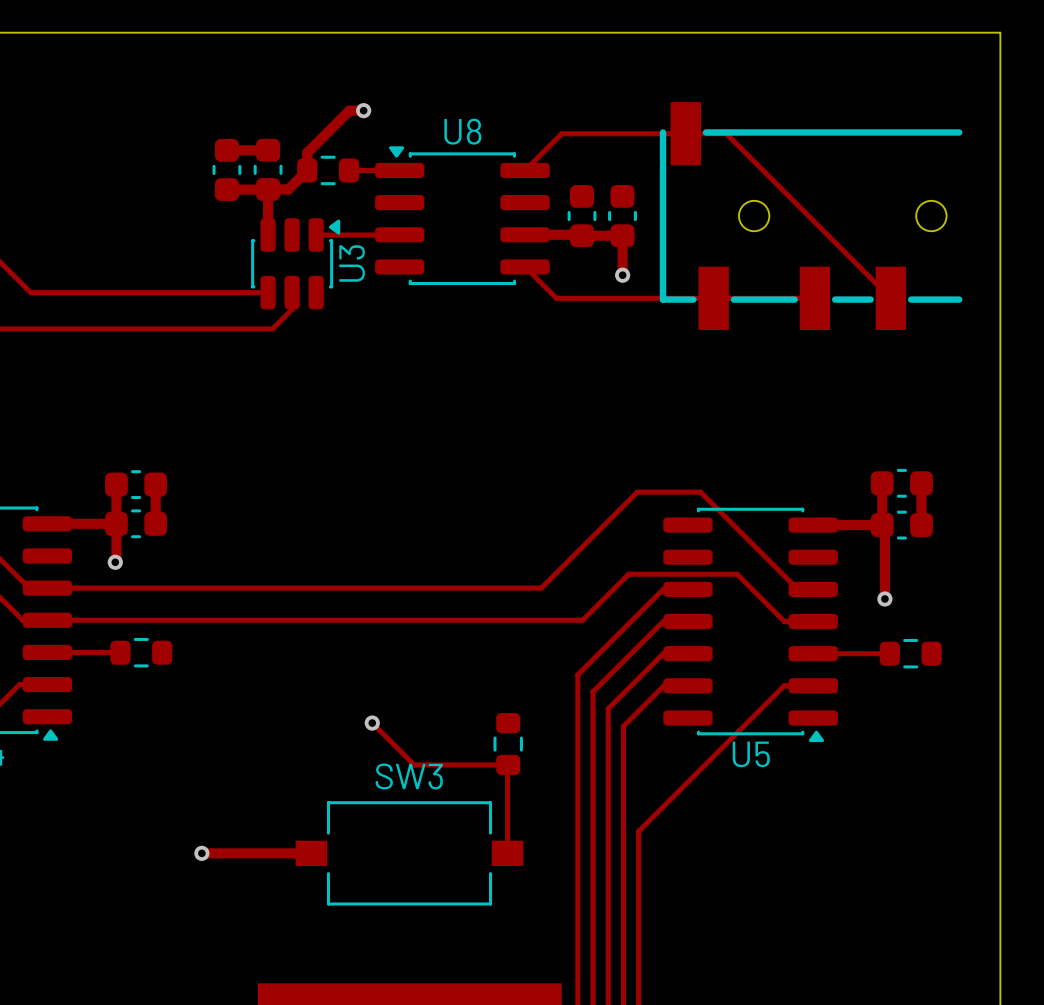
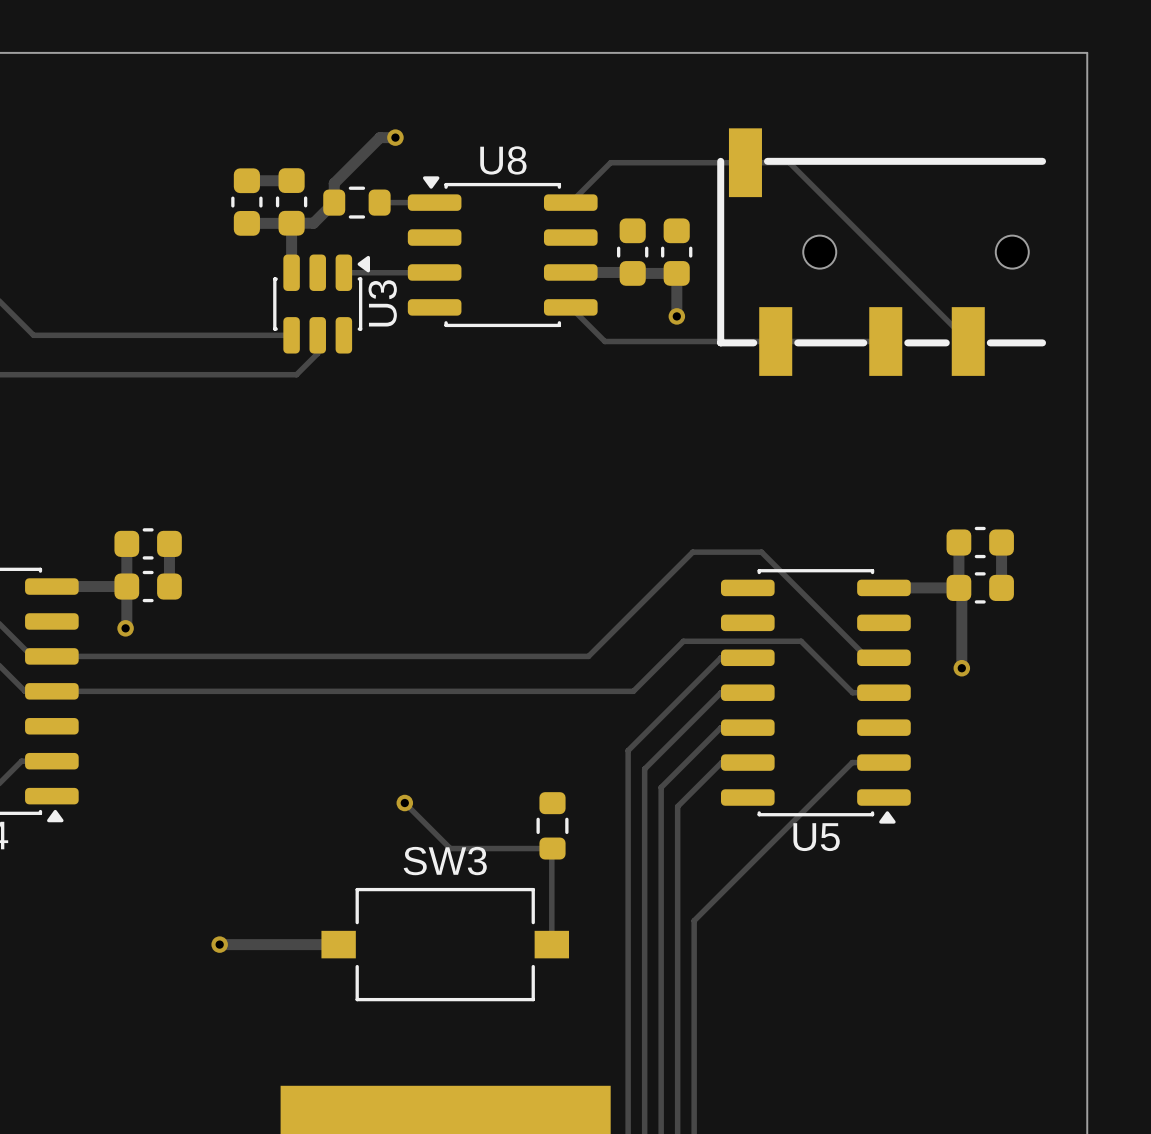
track: (47, 652) (120, 652) -> none
part: (141, 652) -> none
track: (813, 653) (889, 653) -> none
part: (910, 653) -> none

